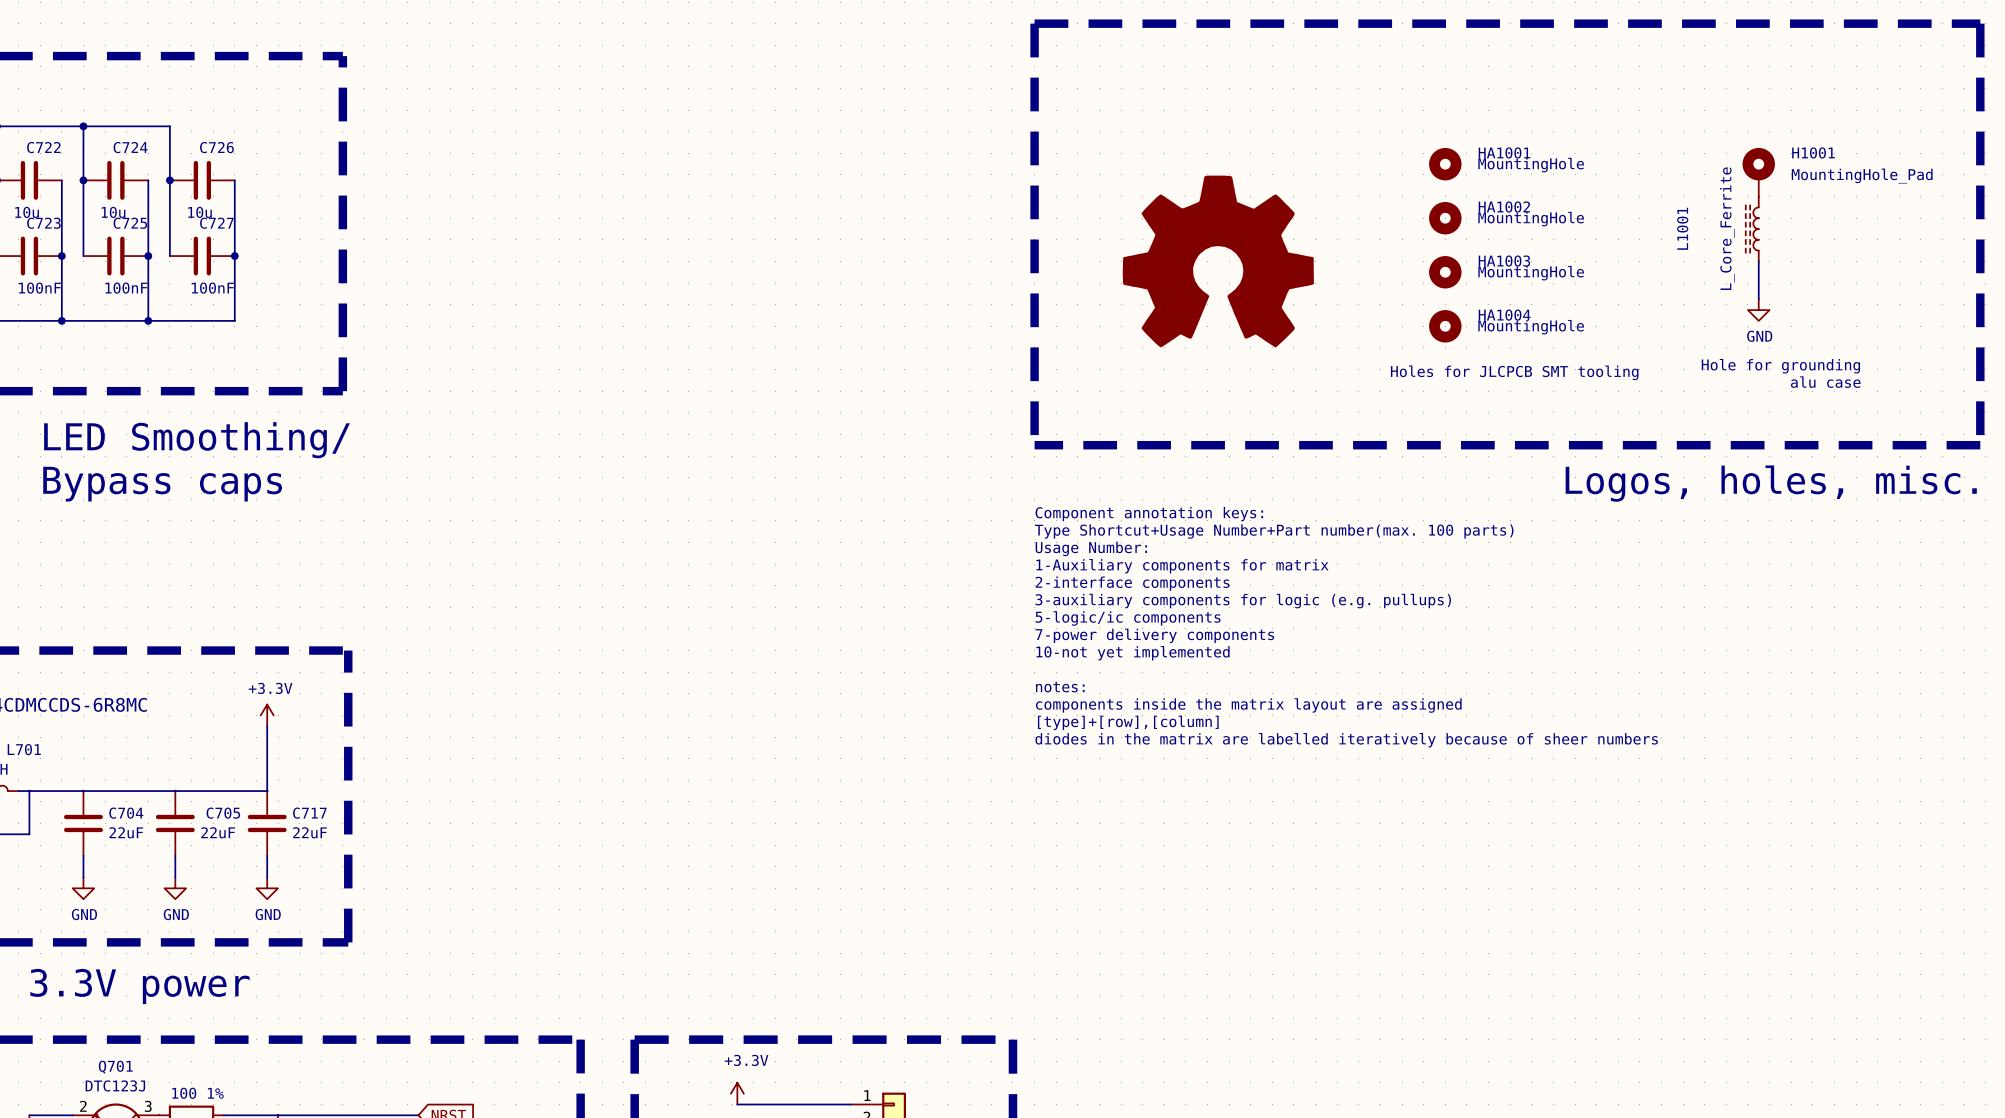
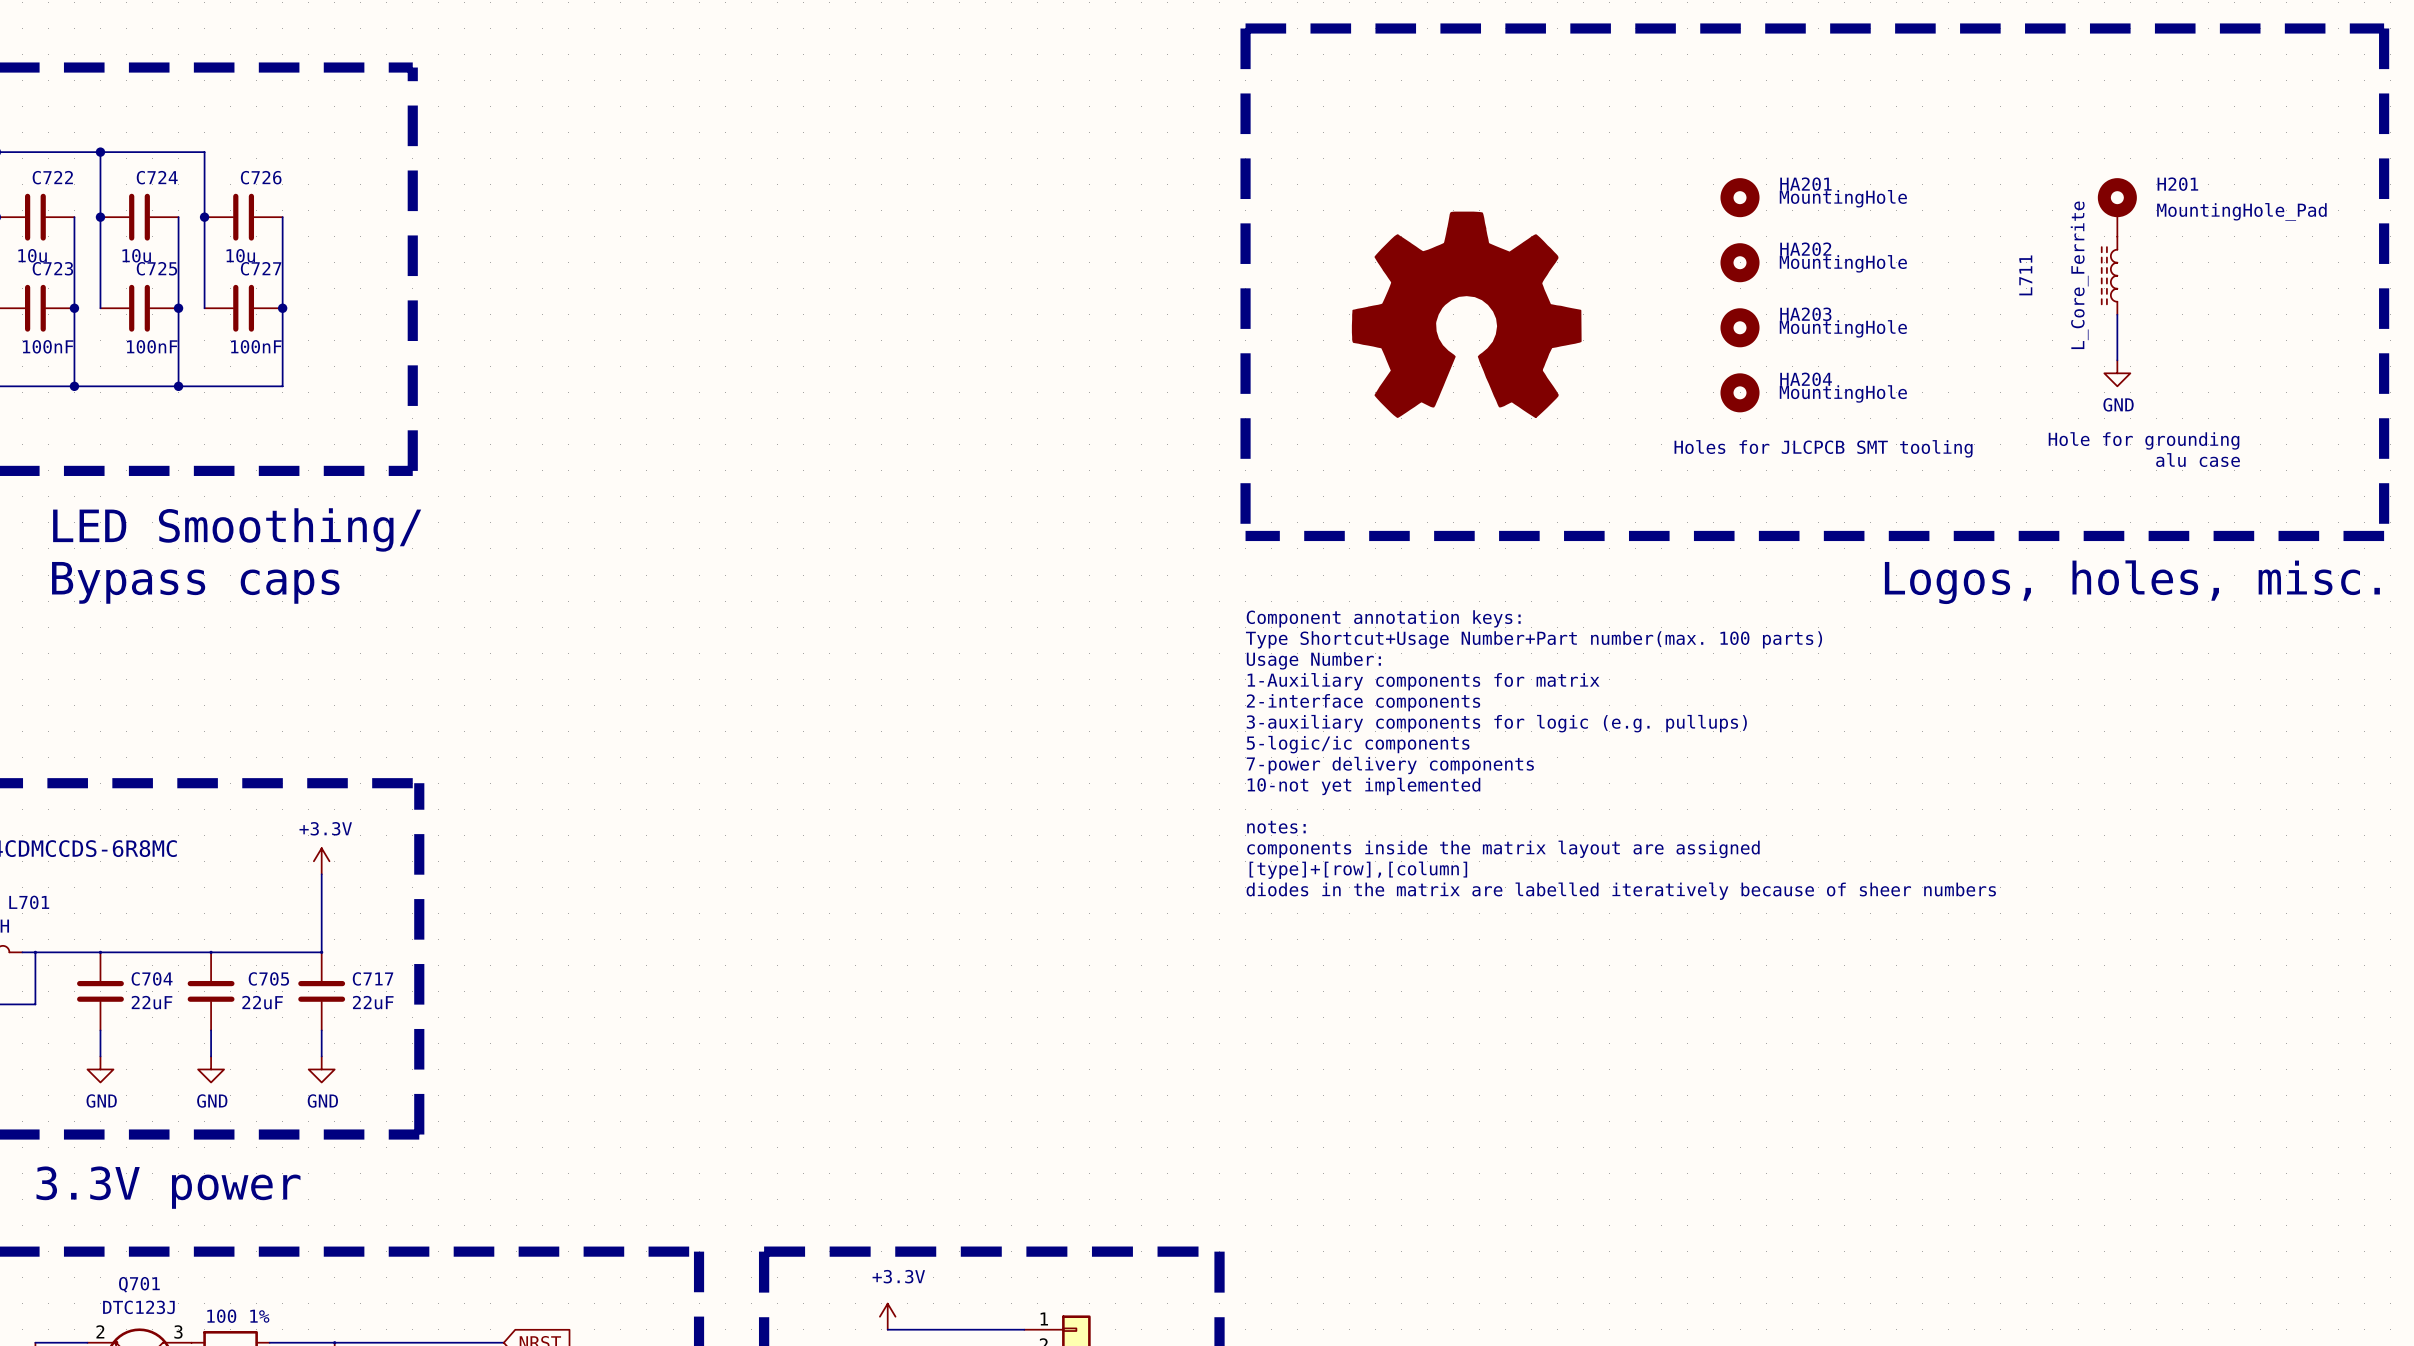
HA1001 name: HA1001 (1504, 152) -> HA201 (1805, 184)
H1001 name: H1001 (1813, 152) -> H201 (2177, 184)
HA1002 name: HA1002 (1504, 207) -> HA202 (1805, 249)
L1001 name: L1001 (1682, 228) -> L711 (2025, 275)
HA1003 name: HA1003 (1504, 261) -> HA203 (1805, 314)
HA1004 name: HA1004 (1504, 315) -> HA204 (1806, 379)

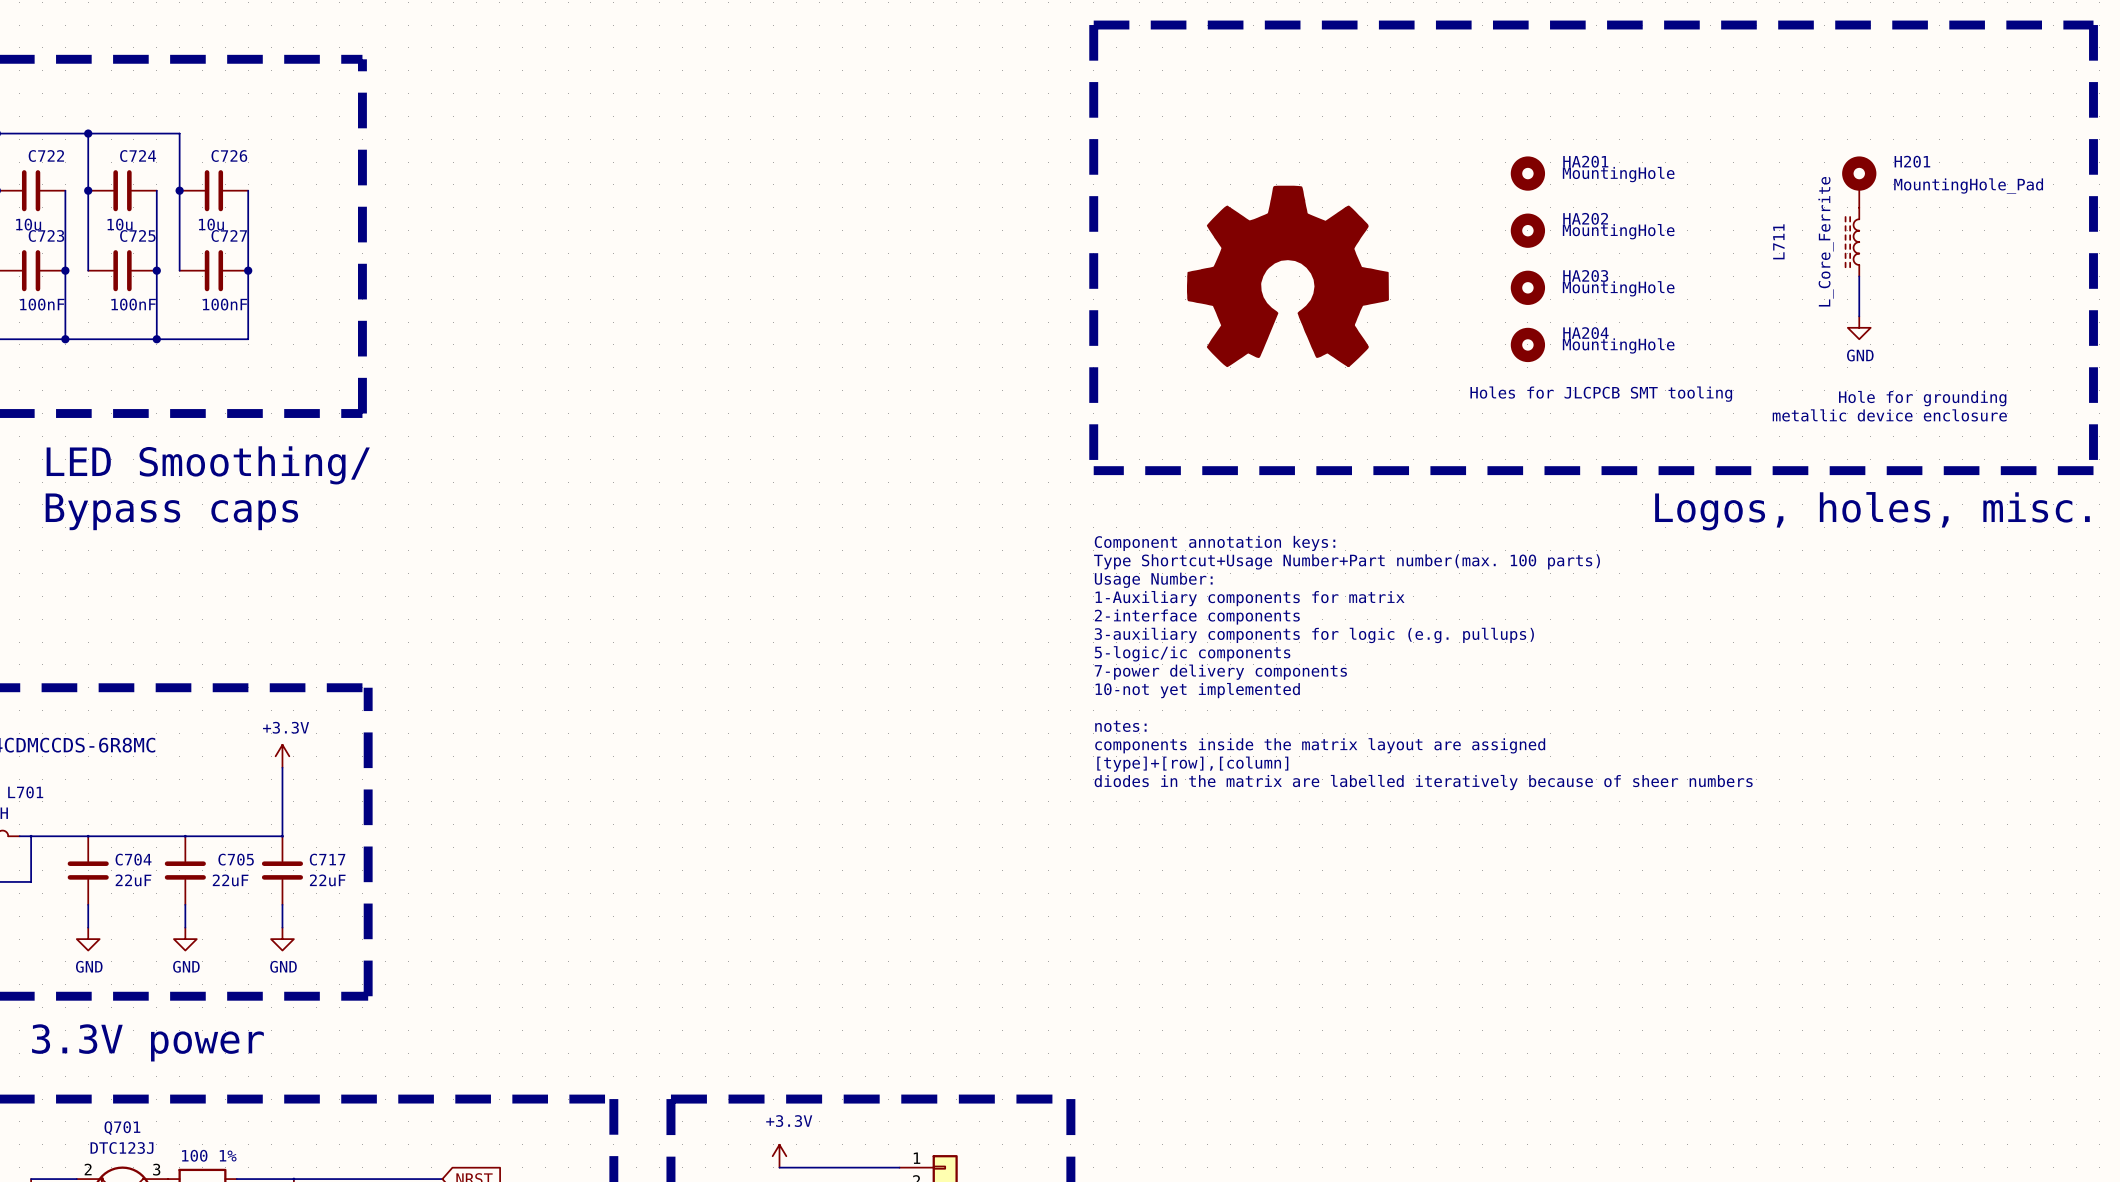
text position: Hole for grounding (2144, 440) -> Hole for grounding (1922, 398)
text: alu case (2198, 460) -> none
text: none -> metallic device enclosure (1889, 415)

